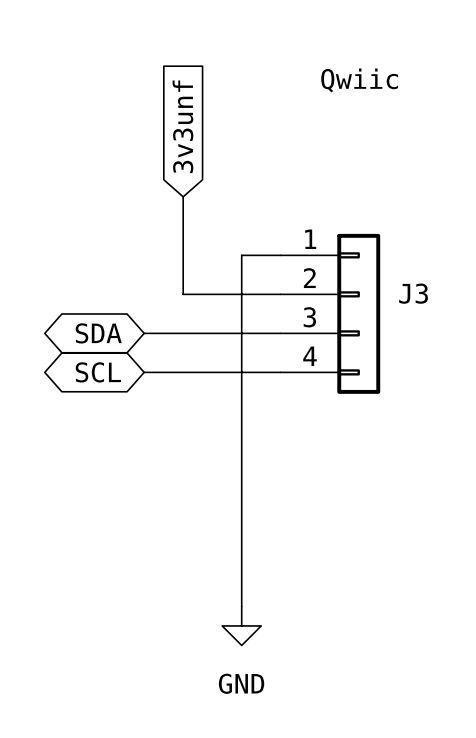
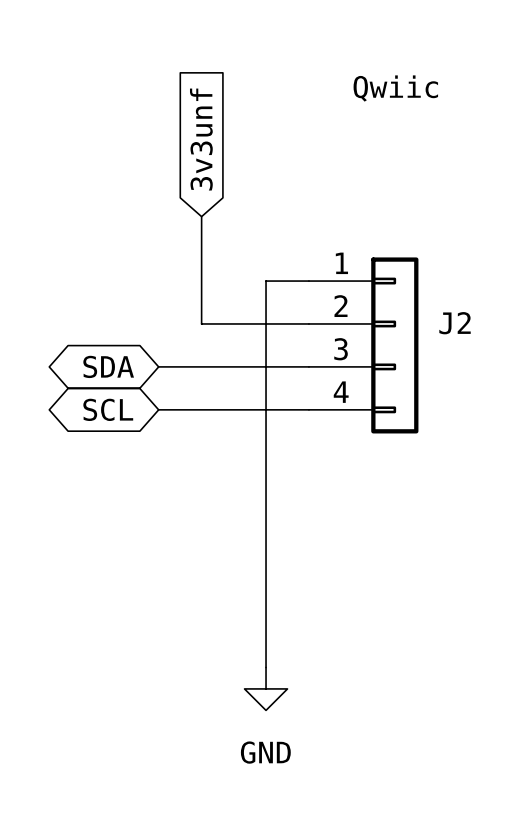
J3 name: J3 (413, 293) -> J2 (455, 323)

